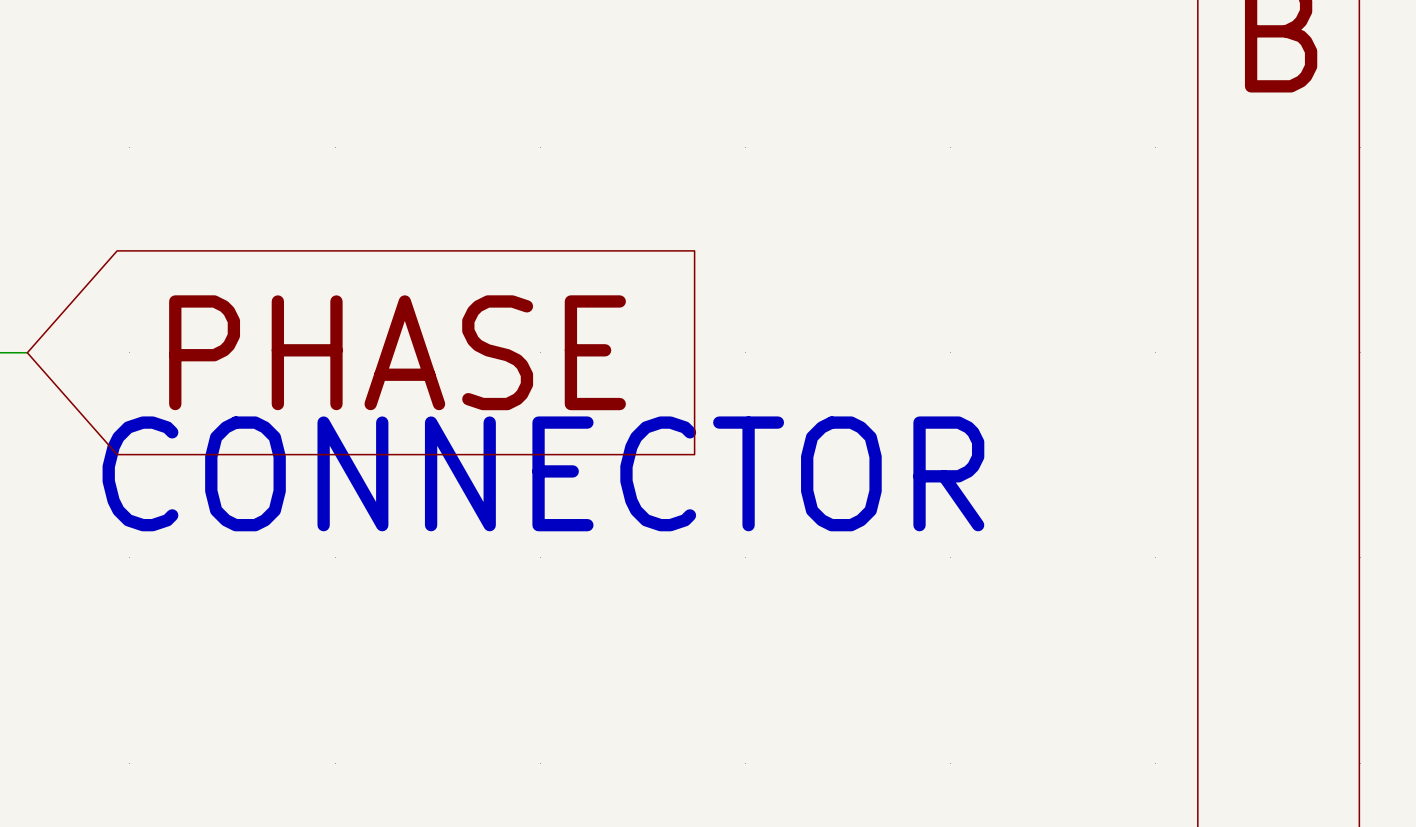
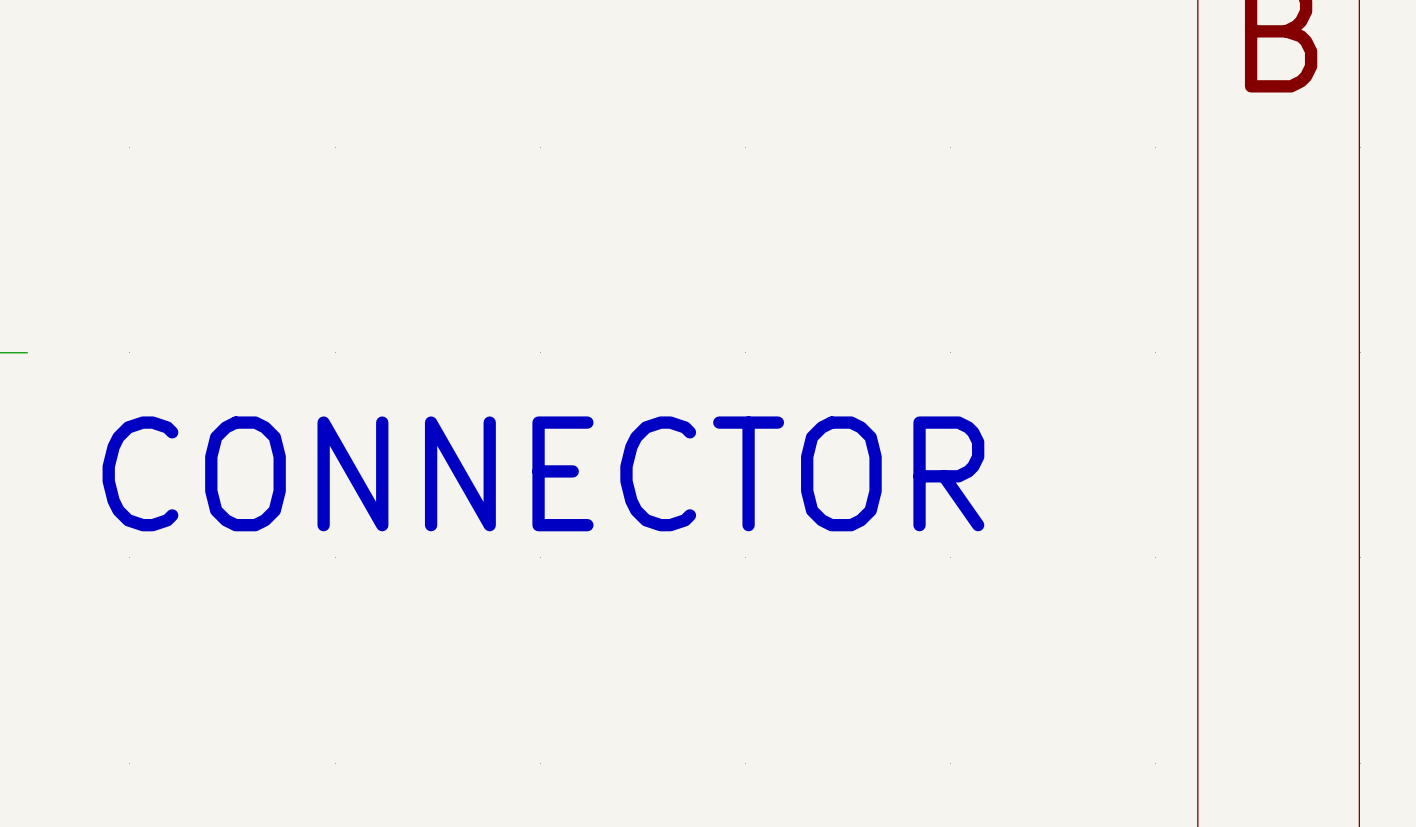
global label: PHASE (397, 352) -> none

